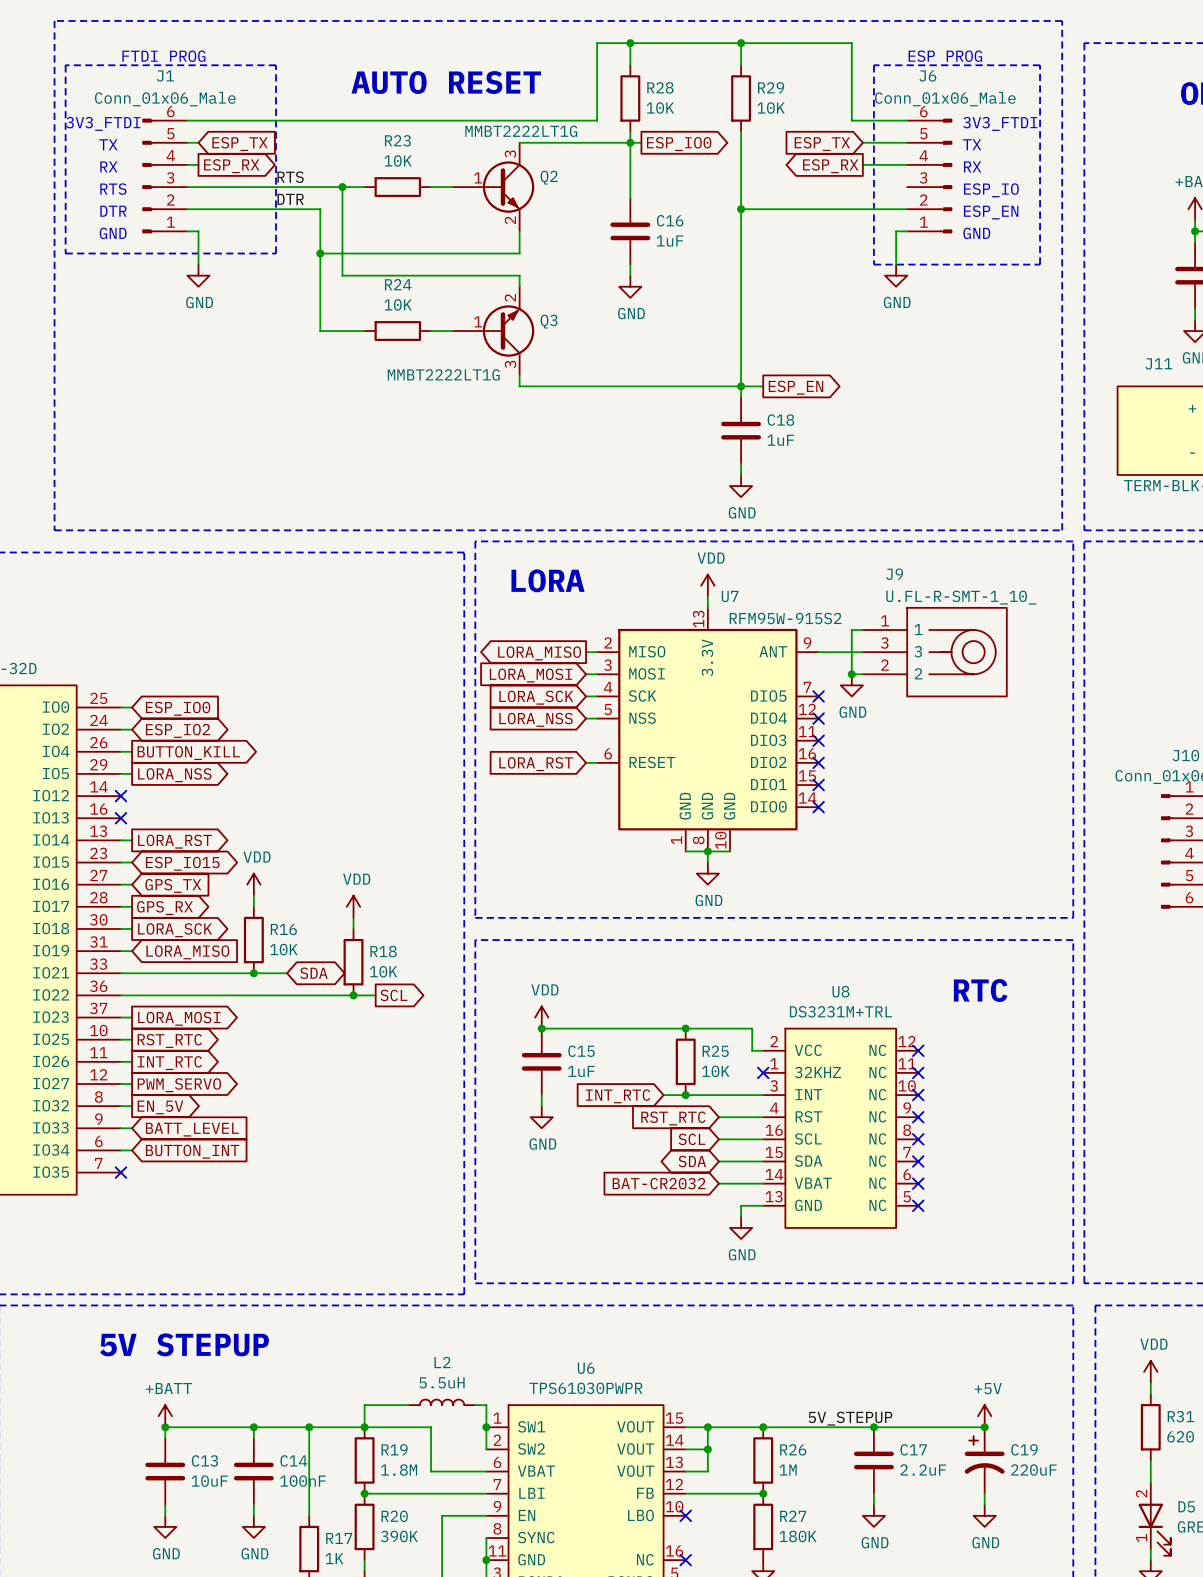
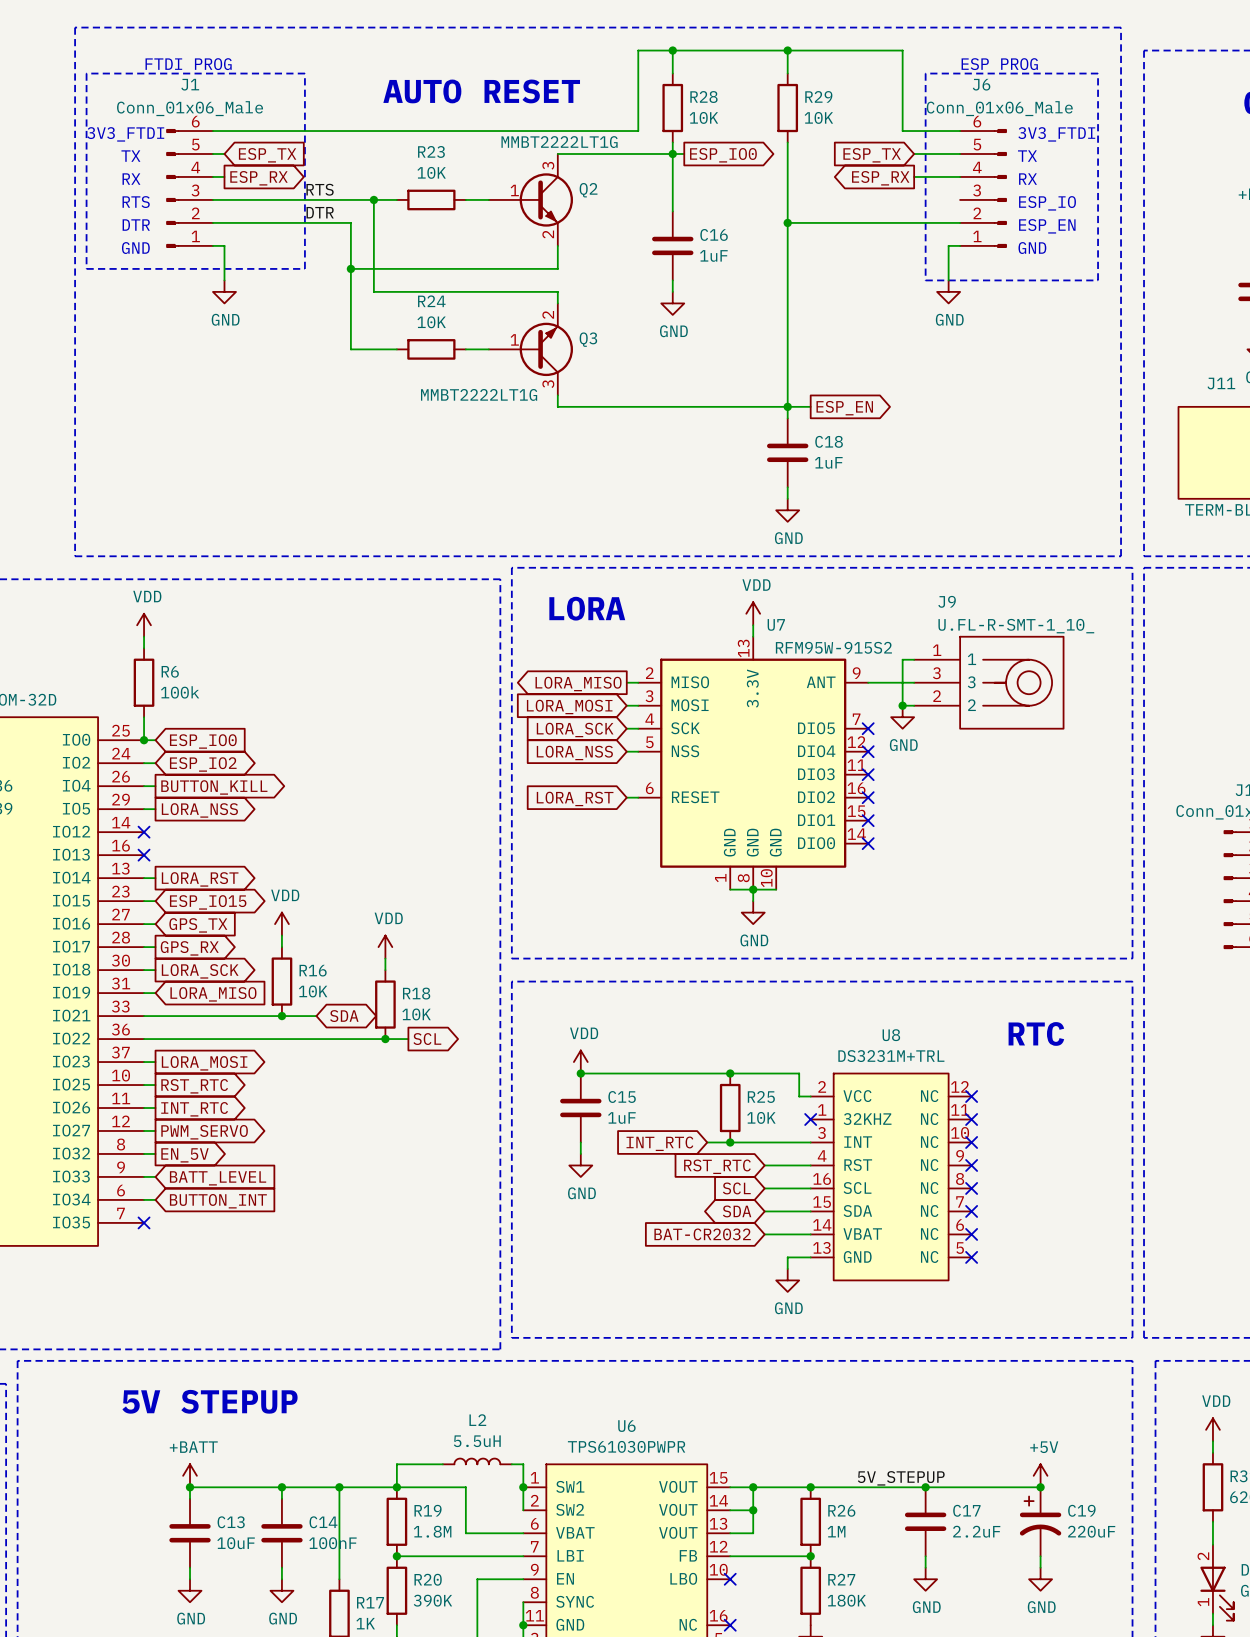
power symbol: none -> VDD (144, 625)
wire: none -> (144, 636) (144, 648)
R6: none -> 100k (144, 682)
wire: none -> (144, 717) (144, 740)
junction: none -> (144, 740)

